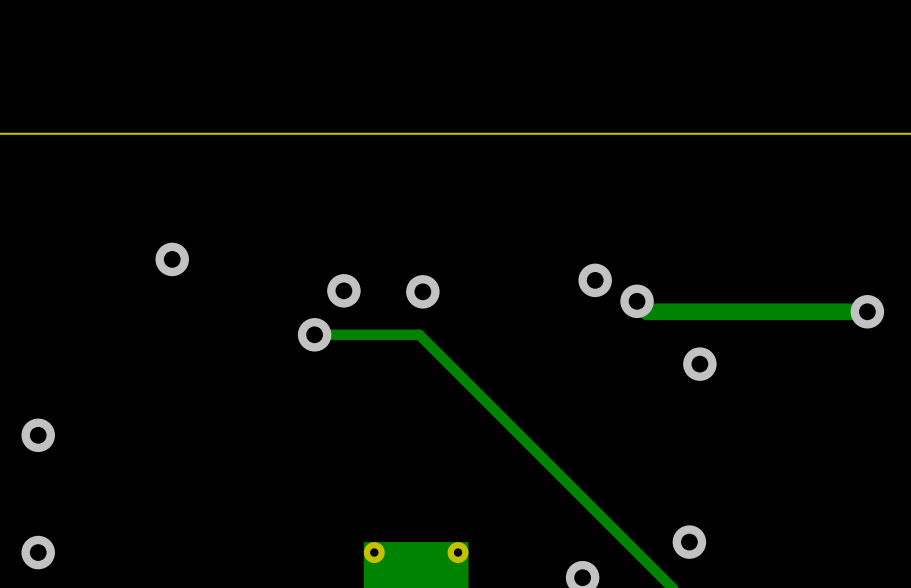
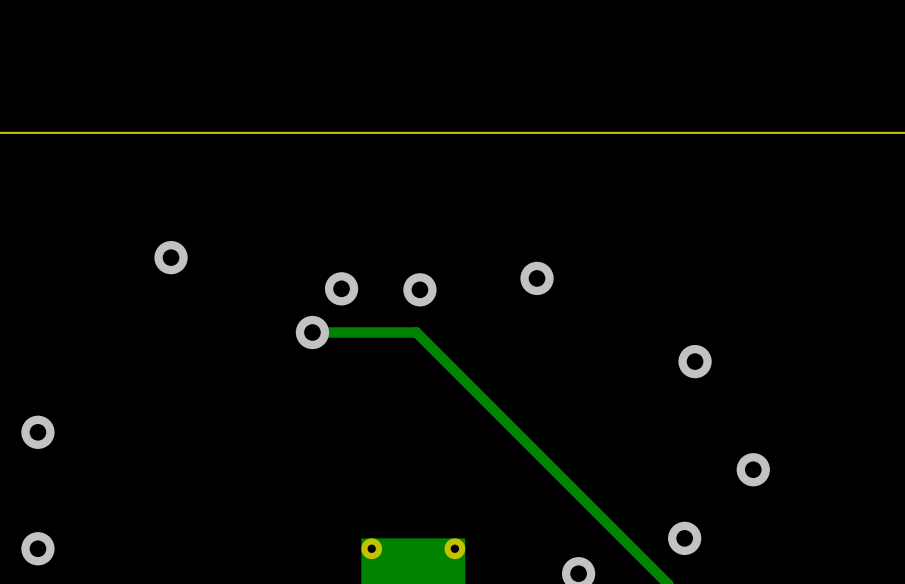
via: none -> (537, 278)
via: (595, 280) -> none
track: (637, 301) (647, 311) (867, 311) -> none
via: (637, 301) -> none
via: (867, 311) -> none
via: none -> (753, 469)

